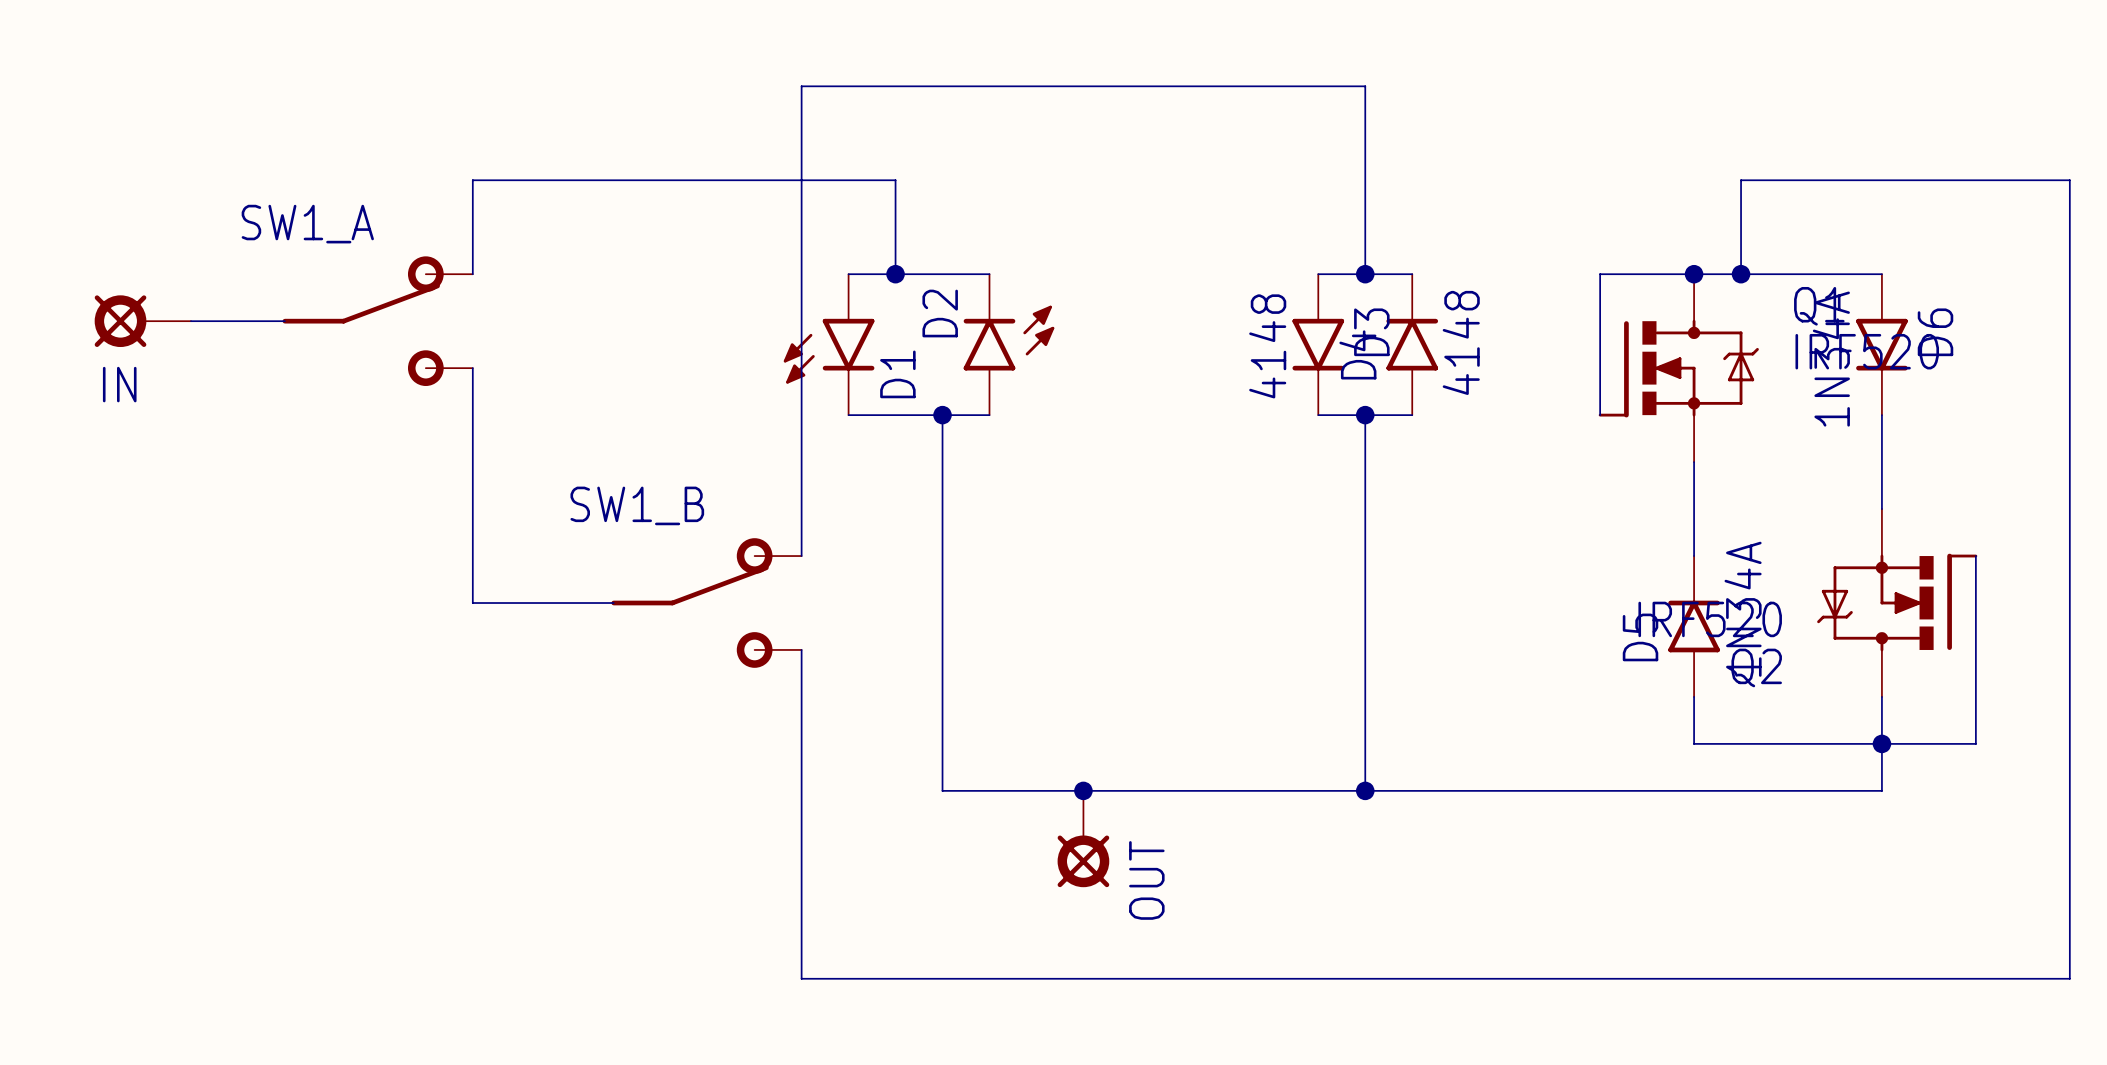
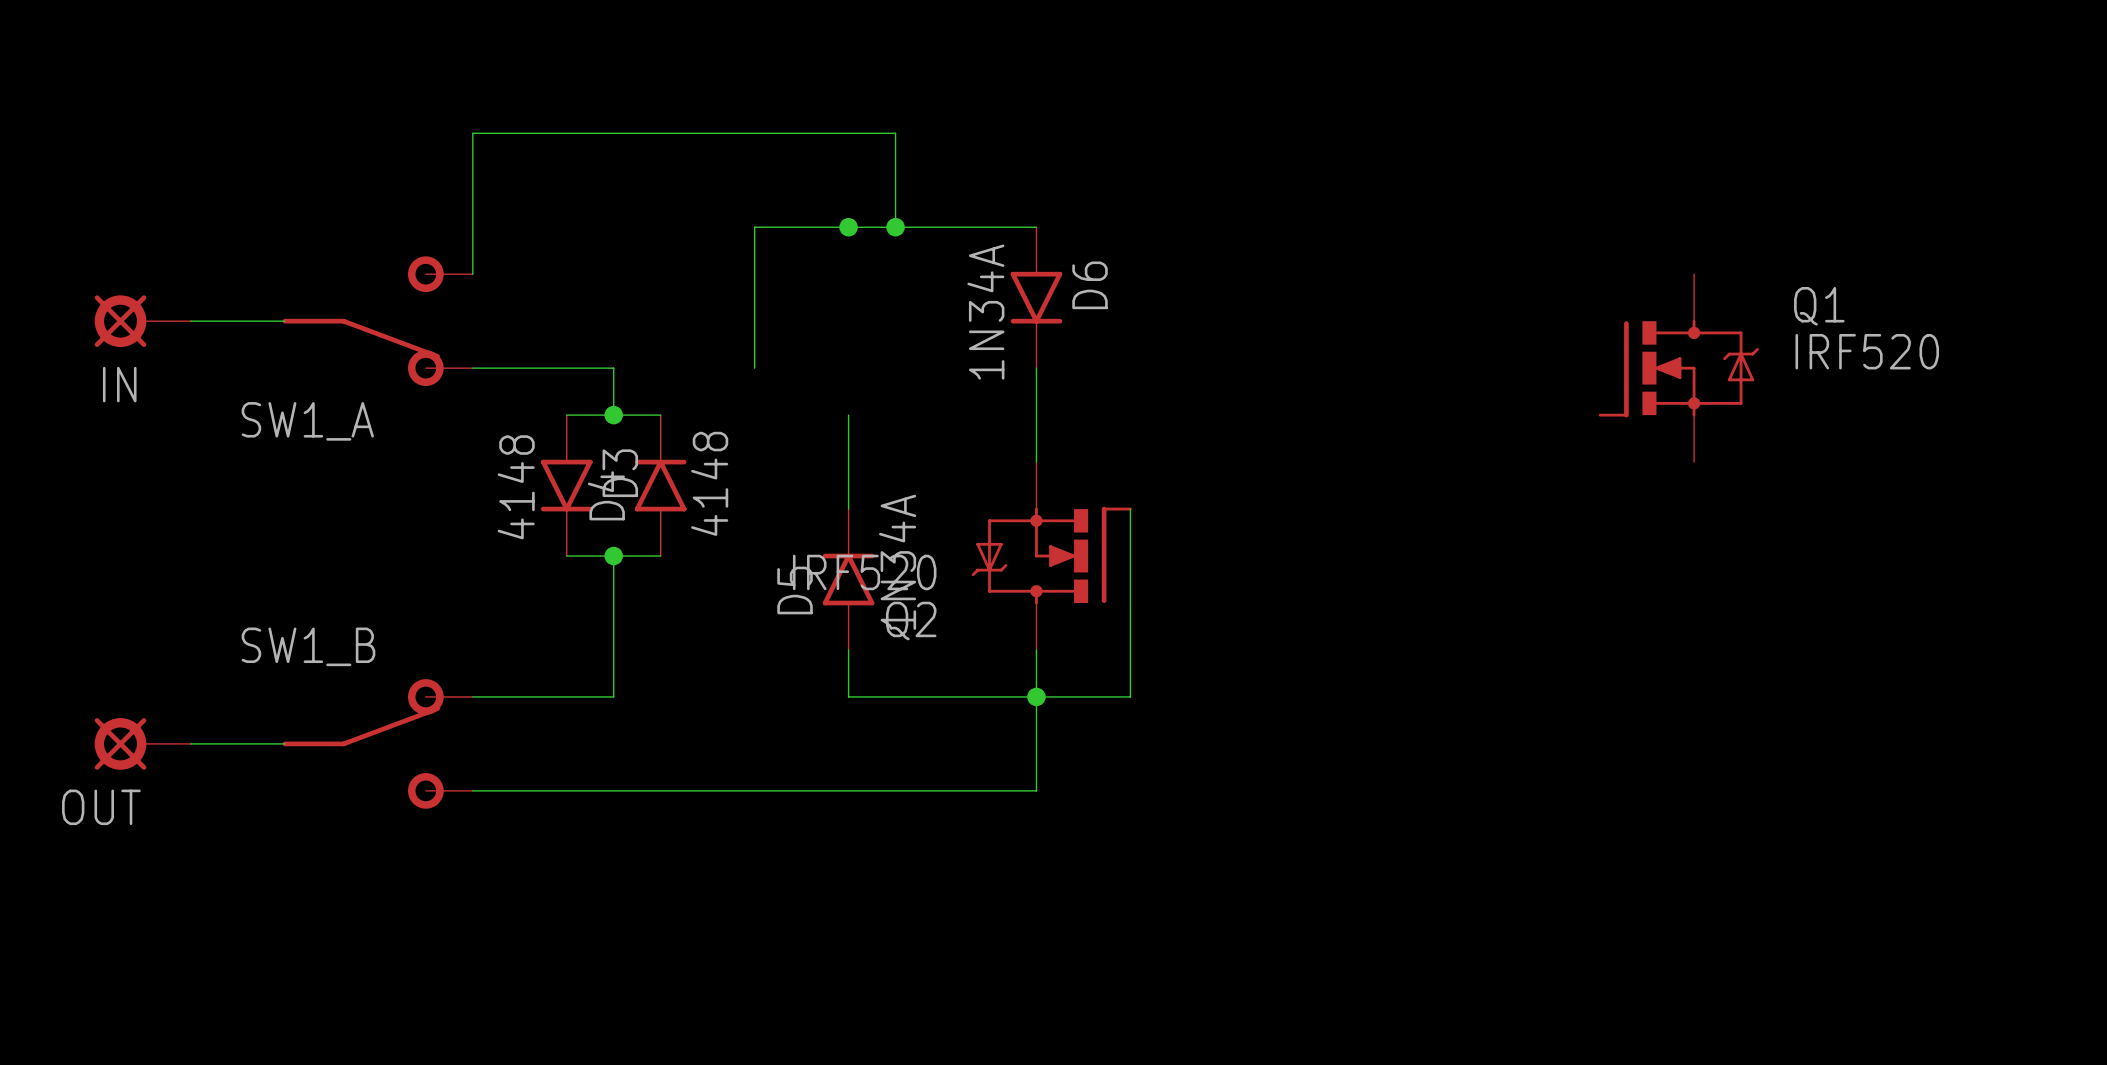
wire: (472, 180) (895, 180) -> (472, 180) (472, 133) (895, 133) (895, 180)
junction: none -> (848, 227)
wire: (895, 227) (895, 274) -> none
junction: none -> (895, 227)
wire: none -> (1036, 227) (754, 227) (754, 368)
wire: (848, 274) (989, 274) -> none
junction: (895, 274) -> none
wire: (1318, 274) (1412, 274) -> none
wire: (1365, 274) (1365, 86) (801, 86) (801, 556) -> none
junction: (1365, 274) -> none
junction: (1694, 274) -> none
wire: (1741, 274) (1741, 180) (2069, 180) (2069, 978) (801, 978) (801, 649) -> none
junction: (1741, 274) -> none
wire: (1881, 274) (1600, 274) (1600, 415) -> none
SW1_A flip: as is (363, 321) -> up-down (363, 321)
D1: (829, 344) -> none
D2: (1008, 344) -> none
D3 position: (1318, 344) -> (566, 485)
D4 position: (1412, 344) -> (660, 485)
D6 position: (1881, 344) -> (1036, 297)
wire: (472, 368) (472, 603) (613, 603) -> (472, 368) (613, 368) (613, 415)
wire: none -> (1036, 368) (1036, 462)
wire: none -> (566, 415) (660, 415)
junction: none -> (613, 415)
wire: (848, 415) (989, 415) -> (848, 415) (848, 509)
wire: (942, 415) (942, 790) -> (472, 790) (942, 790)
junction: (942, 415) -> none
wire: (1318, 415) (1412, 415) -> none
wire: (1365, 415) (1365, 790) -> none
junction: (1365, 415) -> none
wire: (1881, 415) (1881, 509) -> none
wire: (1694, 462) (1694, 556) -> none
wire: none -> (1130, 509) (1130, 696) (848, 696) (848, 649)
wire: none -> (566, 556) (660, 556)
wire: none -> (613, 556) (613, 696) (472, 696)
junction: none -> (613, 556)
wire: (1975, 556) (1975, 743) (1694, 743) (1694, 696) -> none
SW1_B position: (706, 603) -> (377, 743)
Q2 position: (1897, 603) -> (1051, 556)
D5 position: (1694, 626) -> (848, 579)
wire: (1881, 696) (1881, 790) (1036, 790) -> (1036, 649) (1036, 790)
OUT: none -> (142, 743)
wire: none -> (190, 743) (284, 743)
junction: (1881, 743) -> none
junction position: (1083, 790) -> (1036, 696)
junction: (1365, 790) -> none
OUT: (1083, 839) -> none

